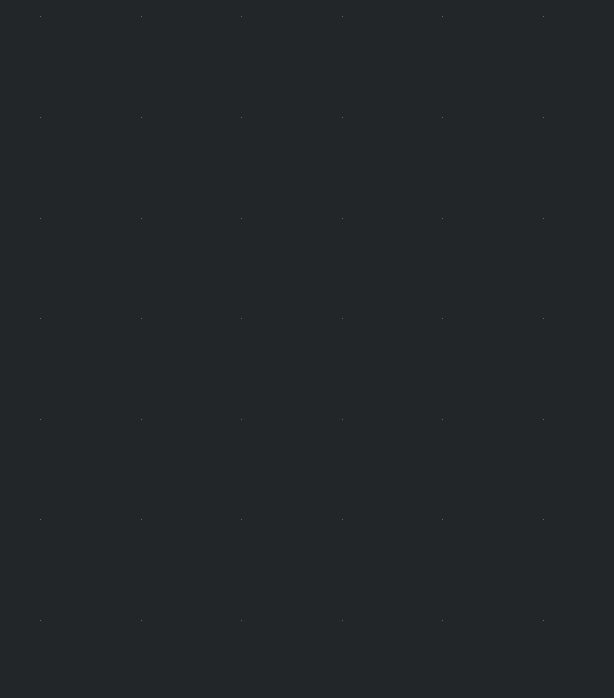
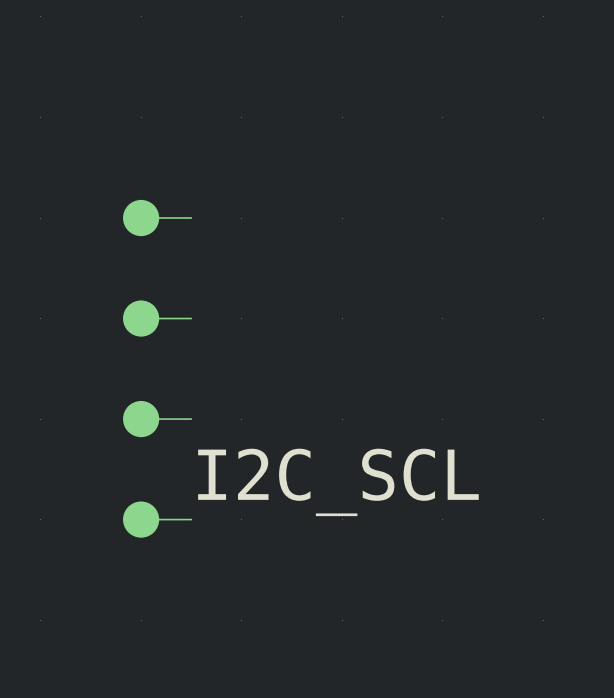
wire: none -> (141, 218) (191, 218)
junction: none -> (141, 218)
wire: none -> (141, 318) (191, 318)
junction: none -> (141, 318)
wire: none -> (141, 419) (191, 419)
junction: none -> (141, 419)
label: none -> I2C_SCL (338, 482)
wire: none -> (141, 519) (191, 519)
junction: none -> (141, 519)

